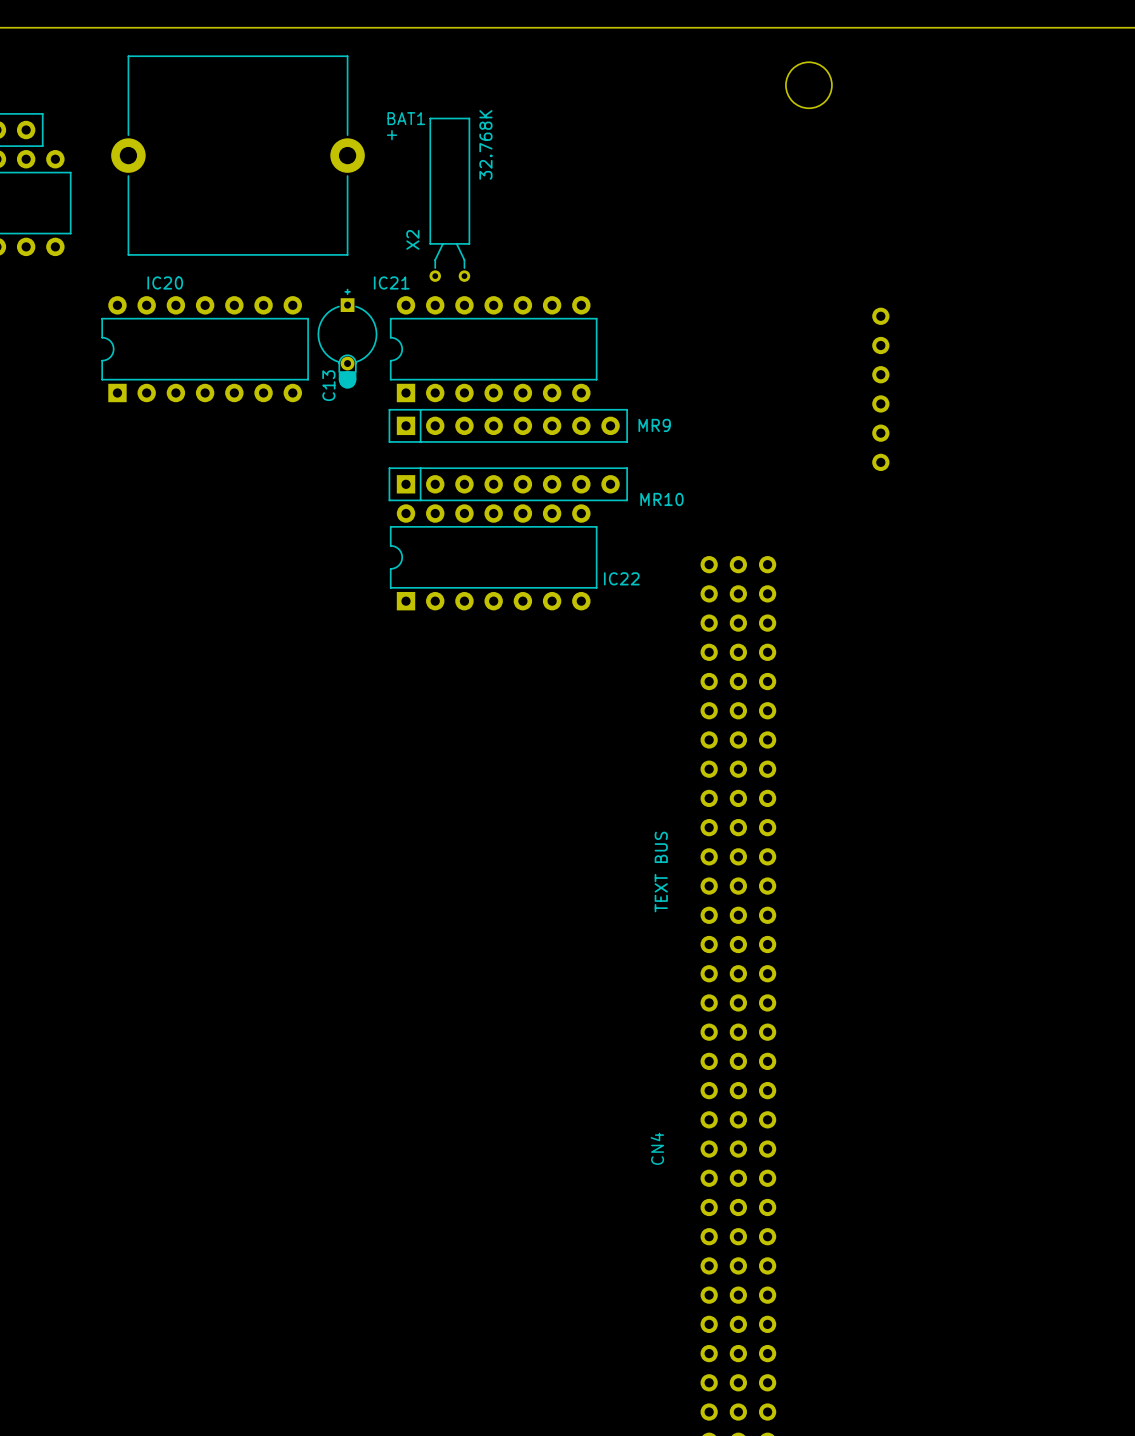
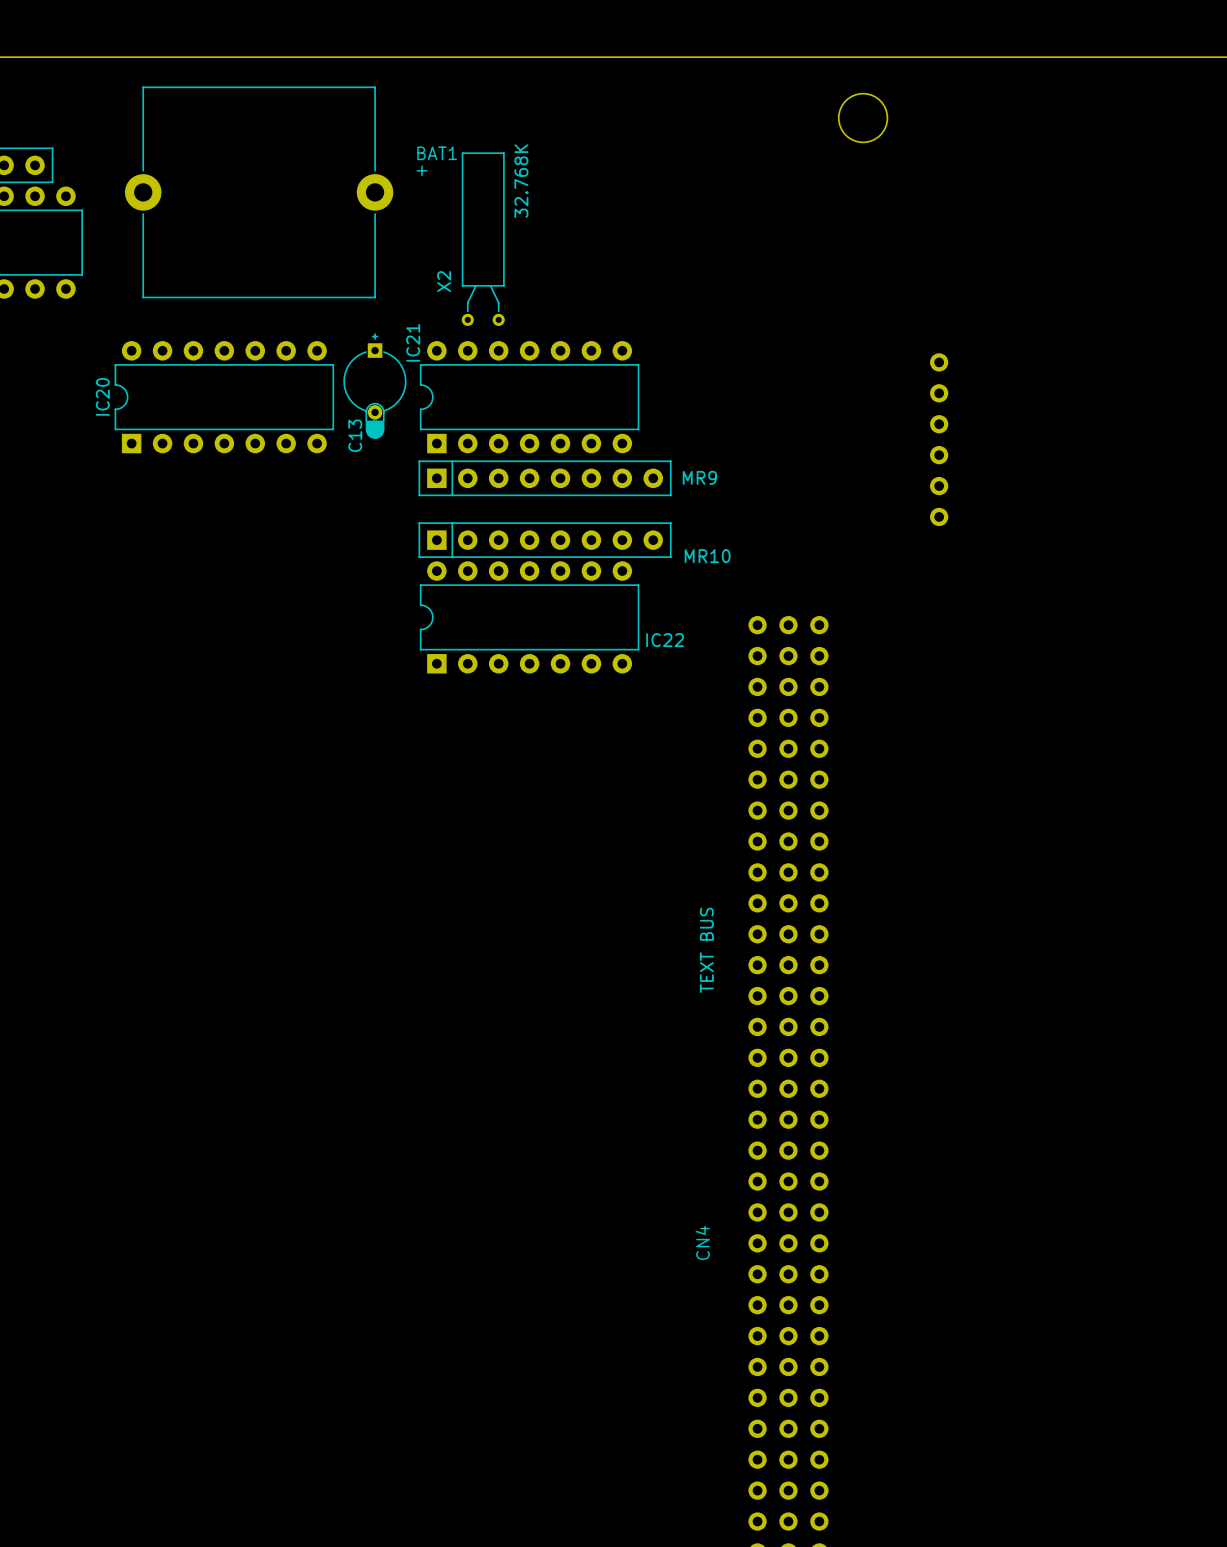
IC20 name rotation: 0° (165, 282) -> 90° counterclockwise (102, 396)
IC20 name position: IC20 (165, 282) -> IC20 (102, 396)
IC21 name rotation: 0° (391, 282) -> 90° counterclockwise (413, 342)

